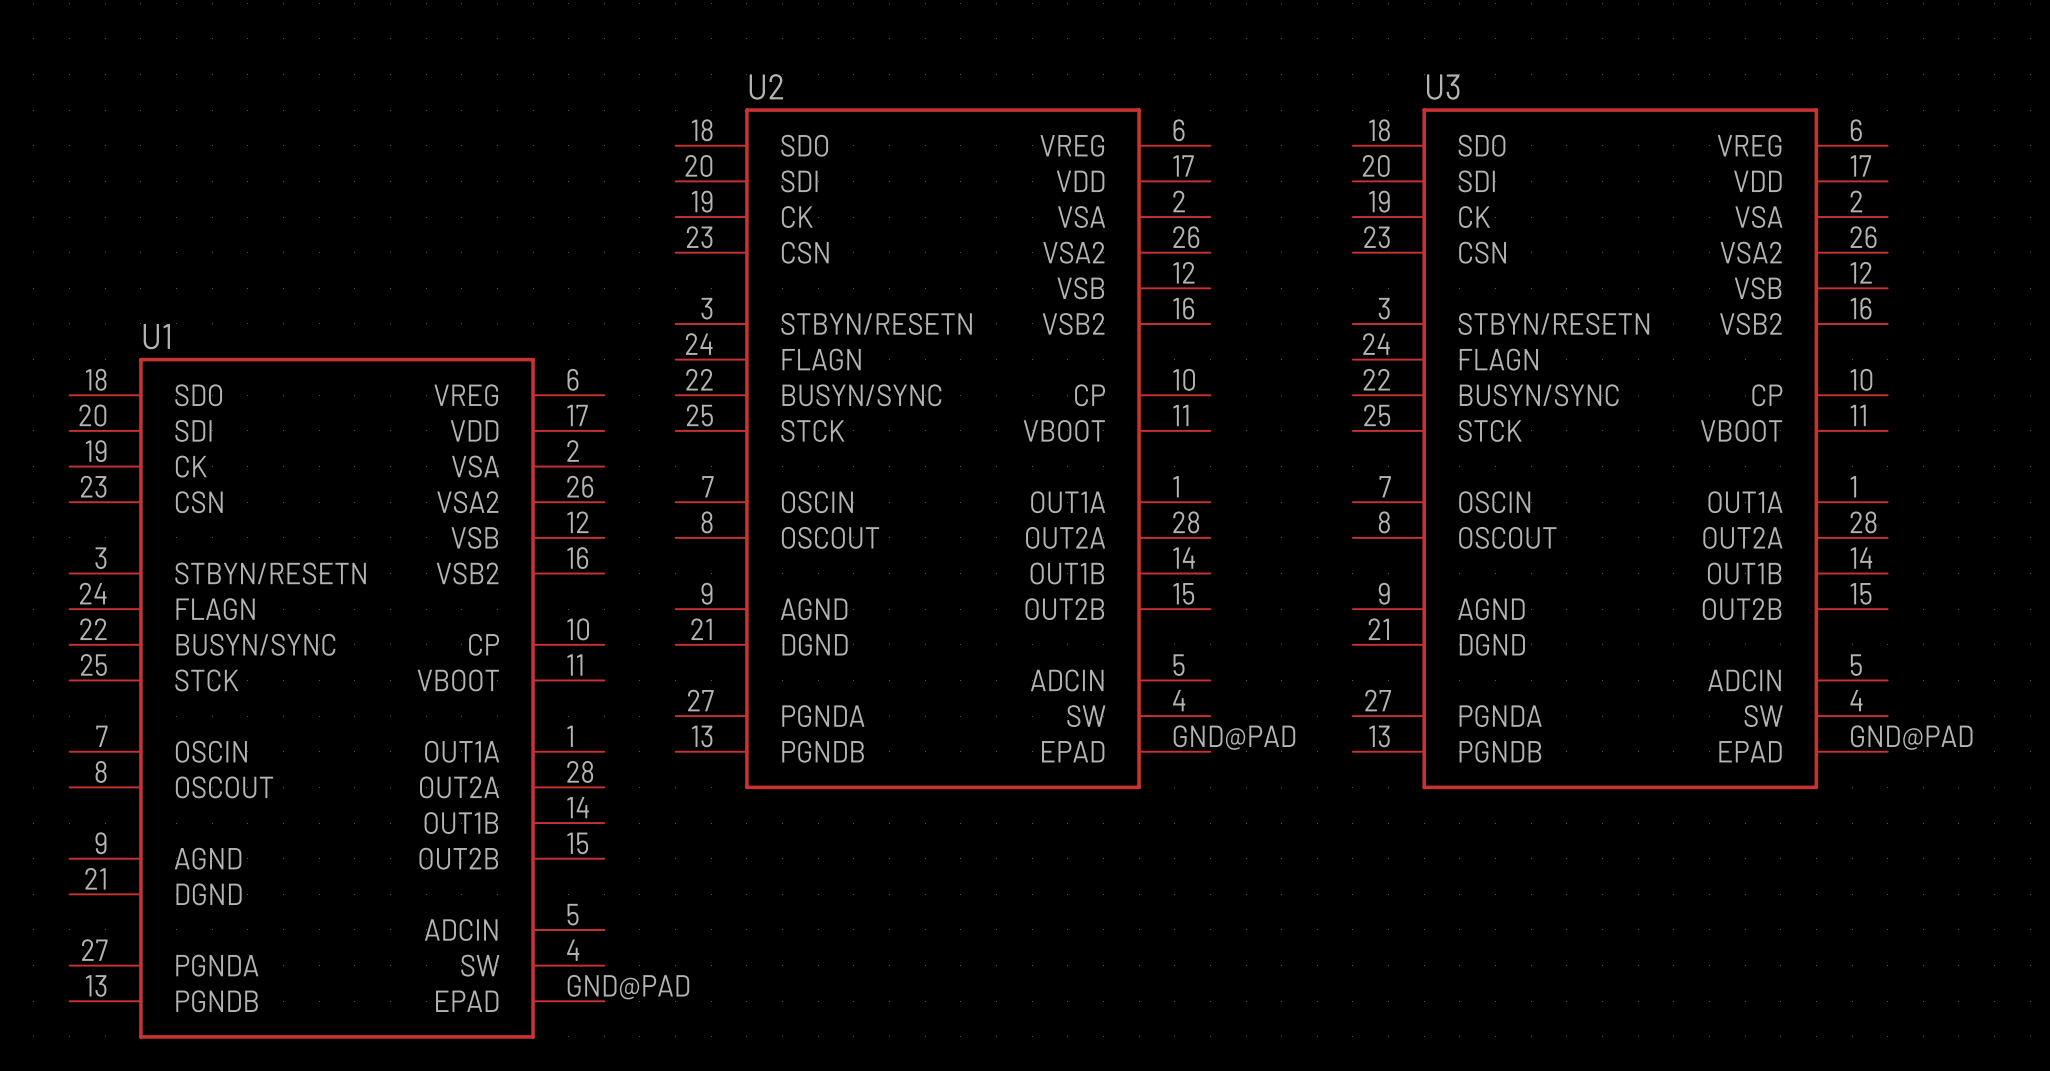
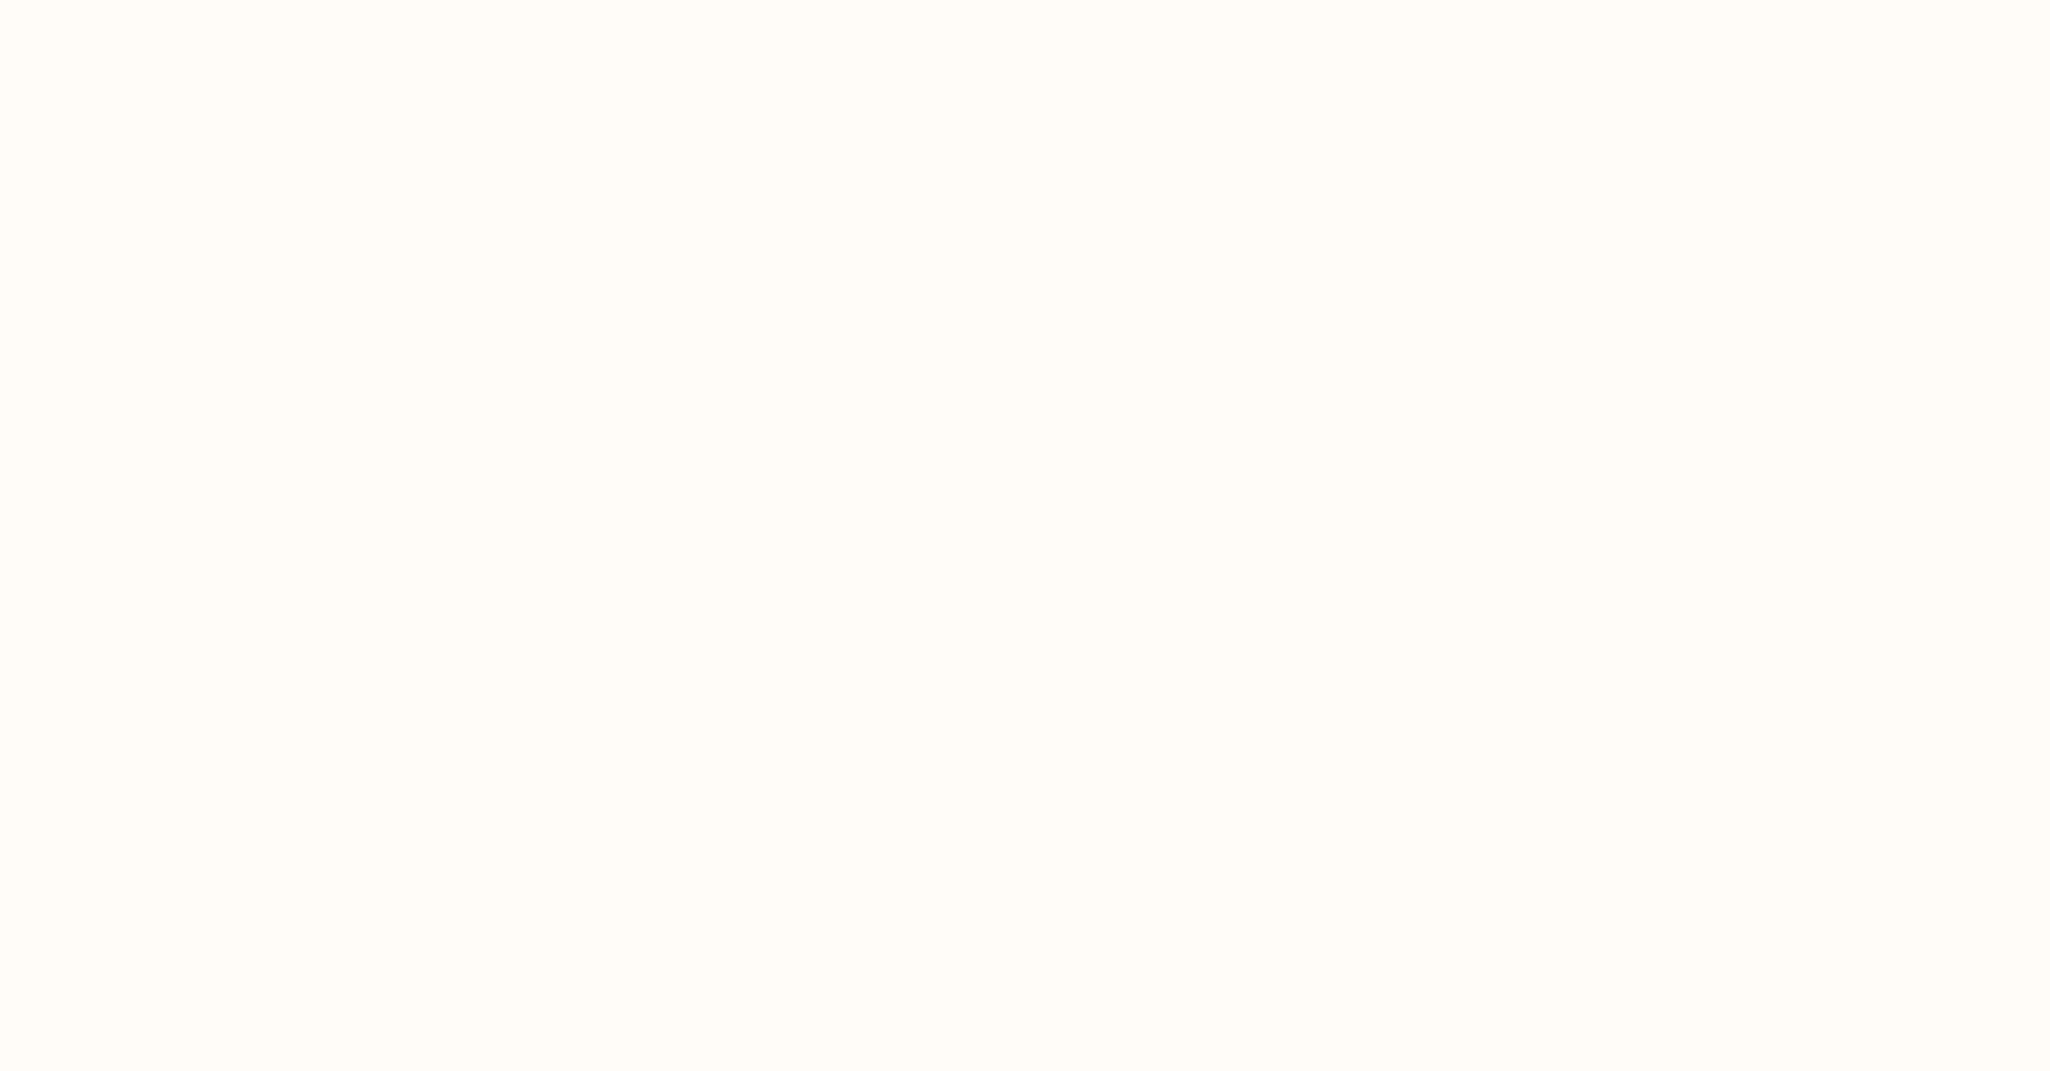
U2: (942, 448) -> none
U3: (1620, 448) -> none
U1: (336, 698) -> none

